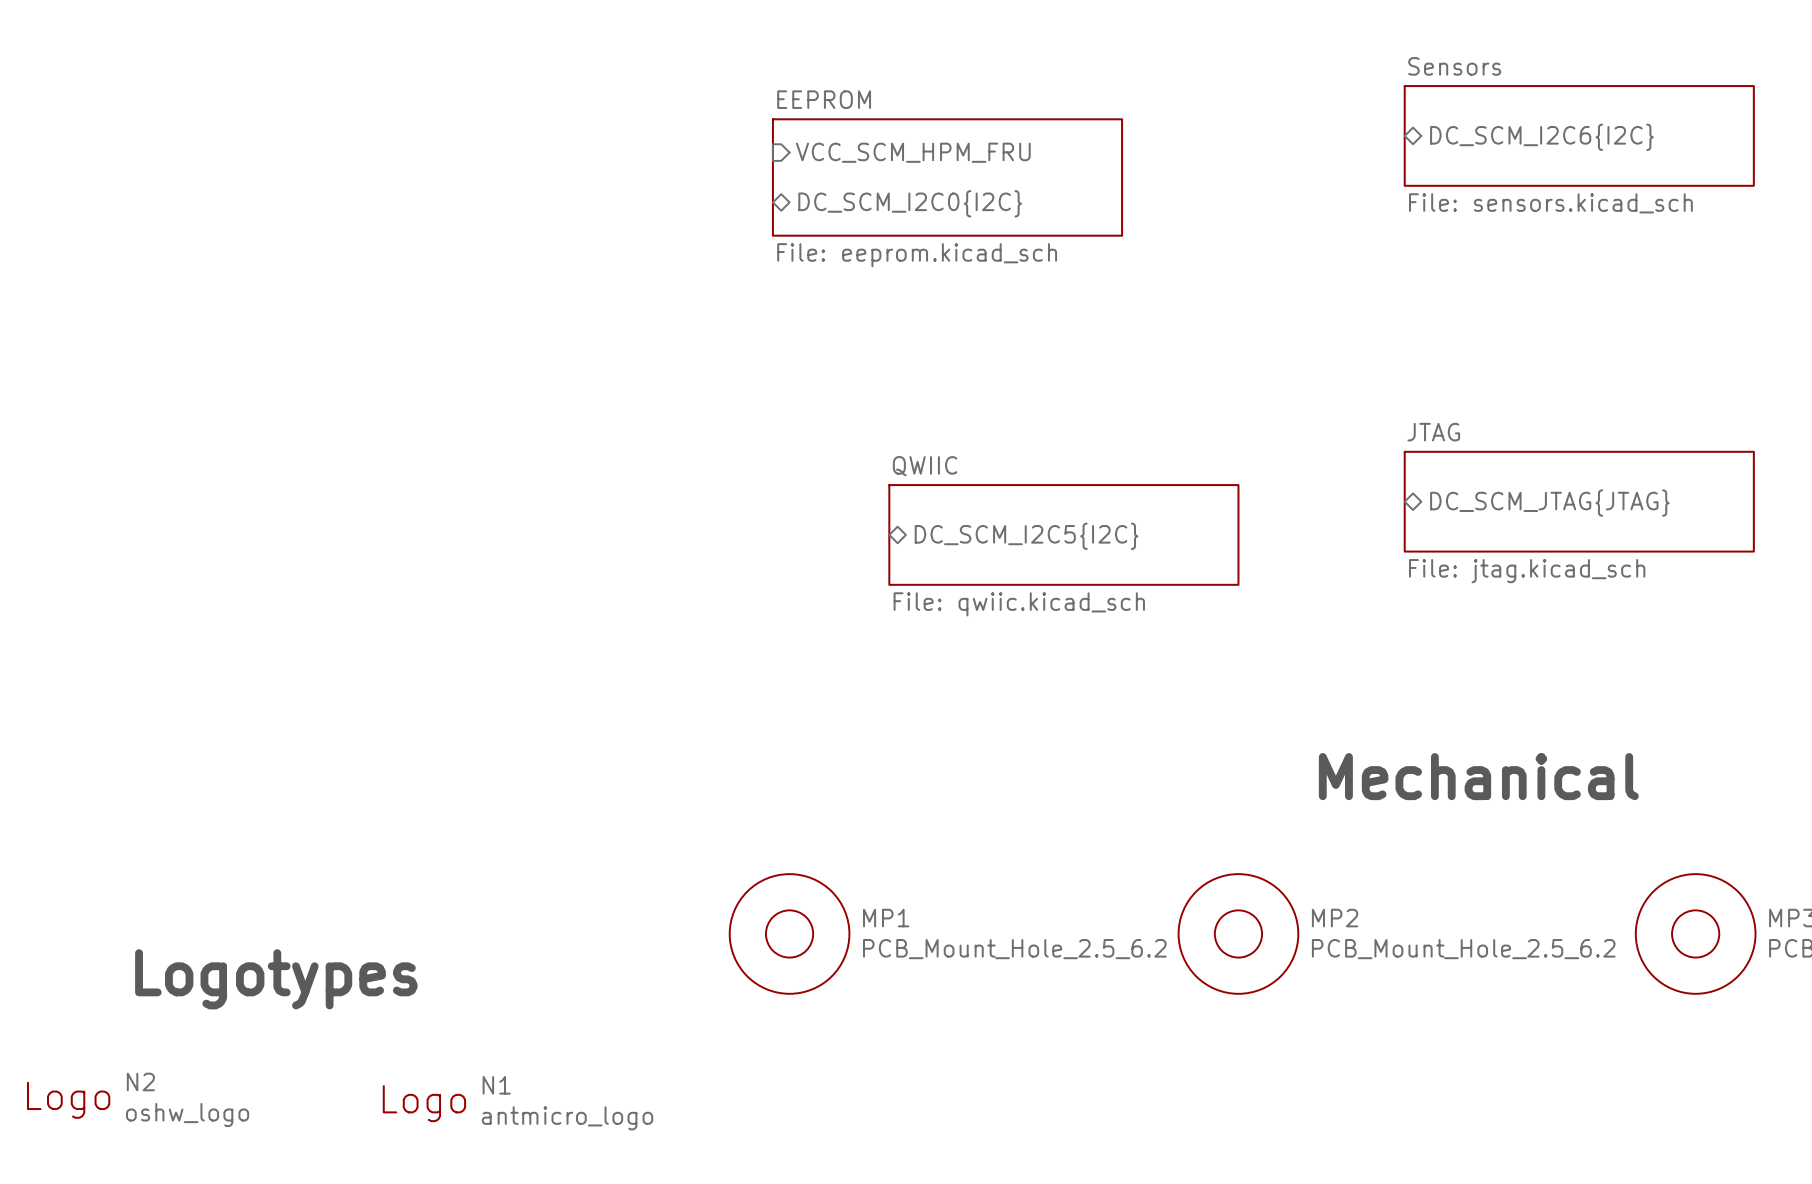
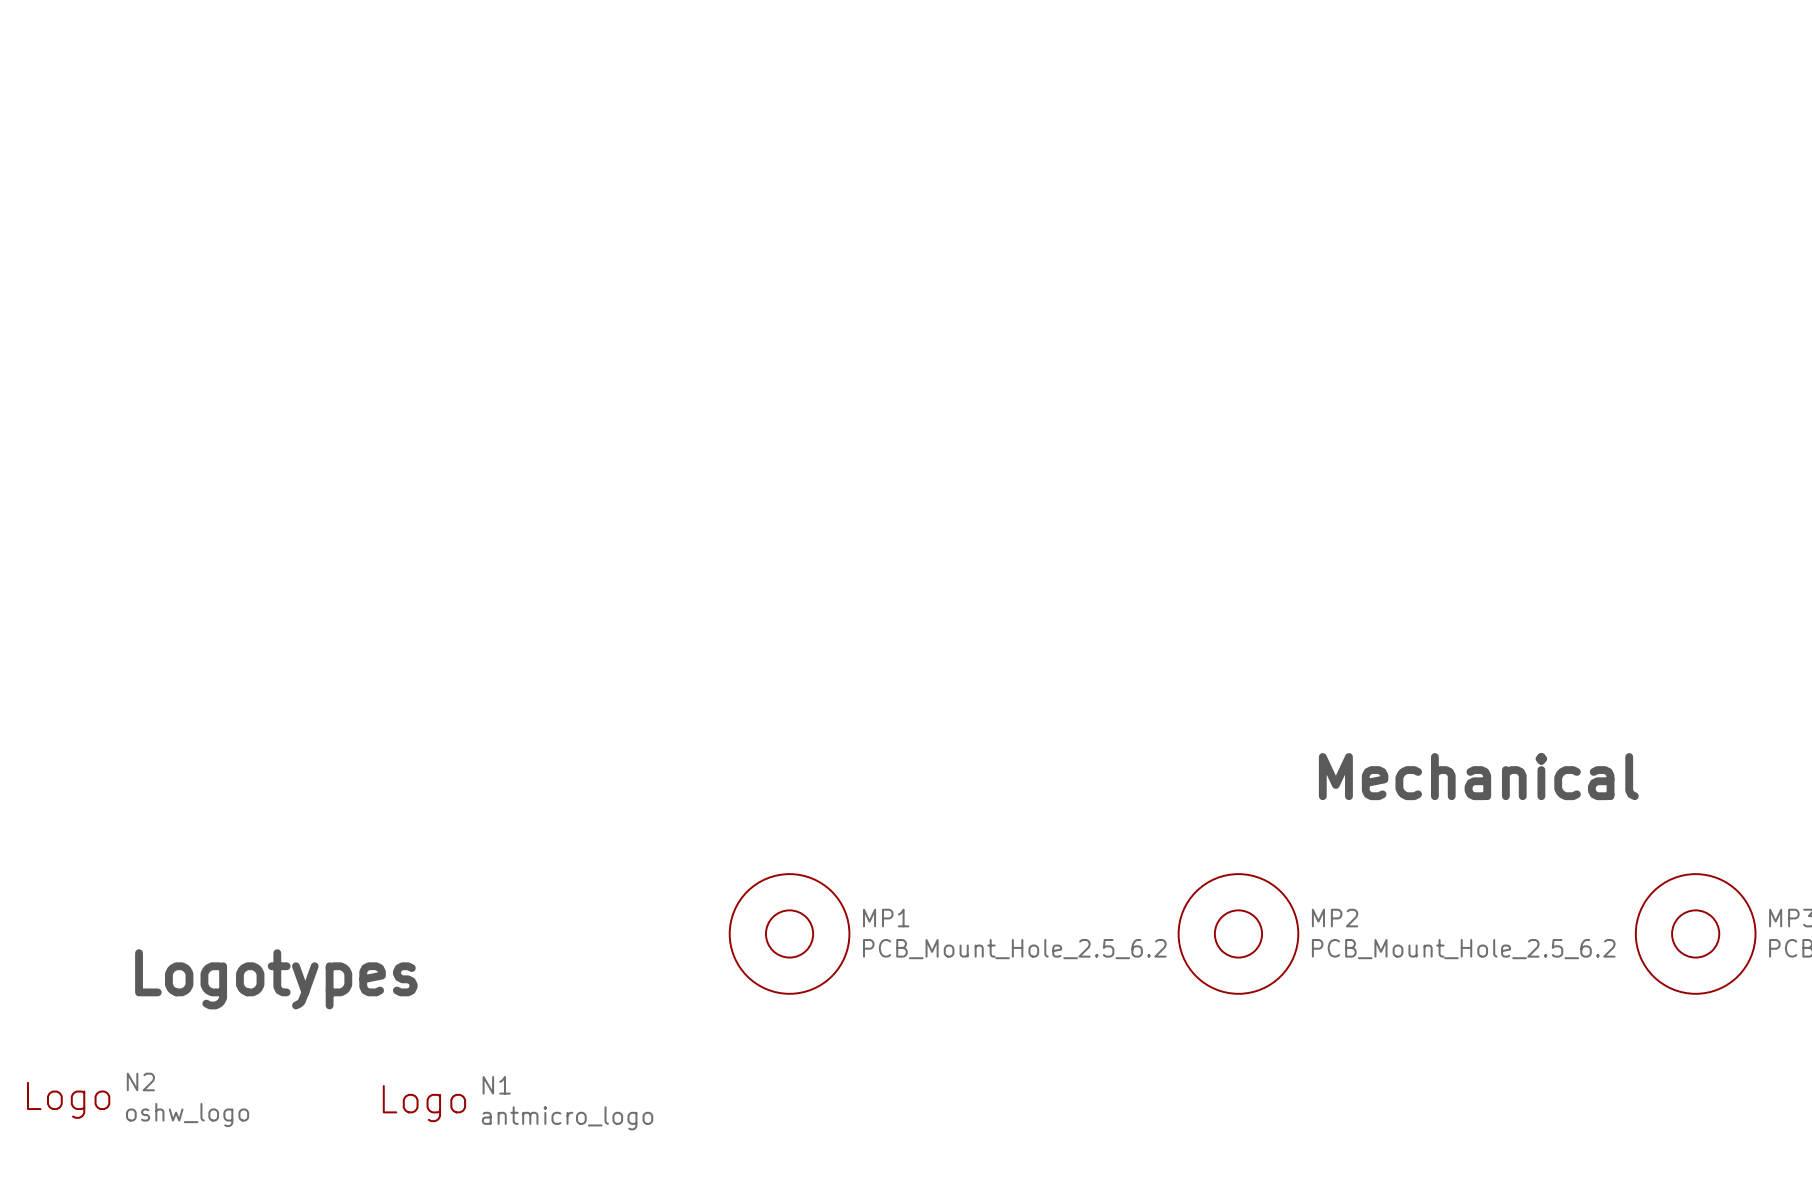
sheet Sensors: File: sensors.kicad_sch (1579, 135) -> none
sheet pin: DC_SCM_I2C6{I2C} (1541, 137) -> none
sheet pin: VCC_SCM_HPM_FRU (913, 152) -> none
sheet EEPROM: File: eeprom.kicad_sch (947, 177) -> none
sheet pin: DC_SCM_I2C0{I2C} (910, 203) -> none
sheet JTAG: File: jtag.kicad_sch (1579, 501) -> none
sheet pin: DC_SCM_JTAG{JTAG} (1549, 503) -> none
sheet QWIIC: File: qwiic.kicad_sch (1063, 534) -> none
sheet pin: DC_SCM_I2C5{I2C} (1026, 536) -> none

